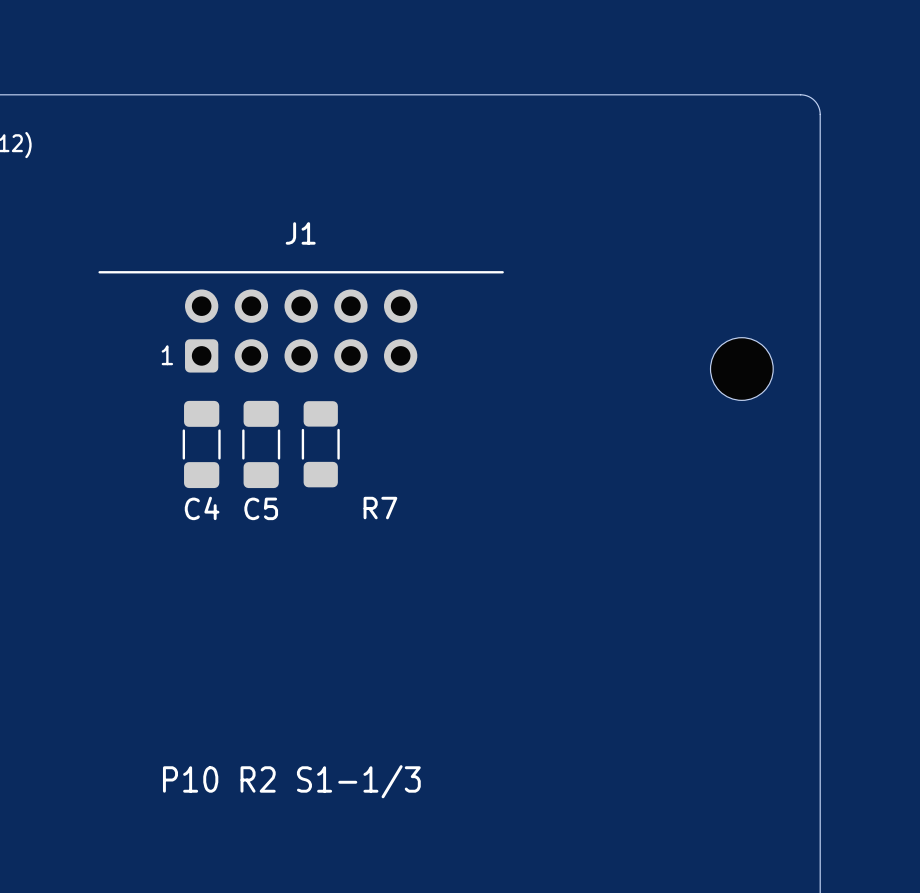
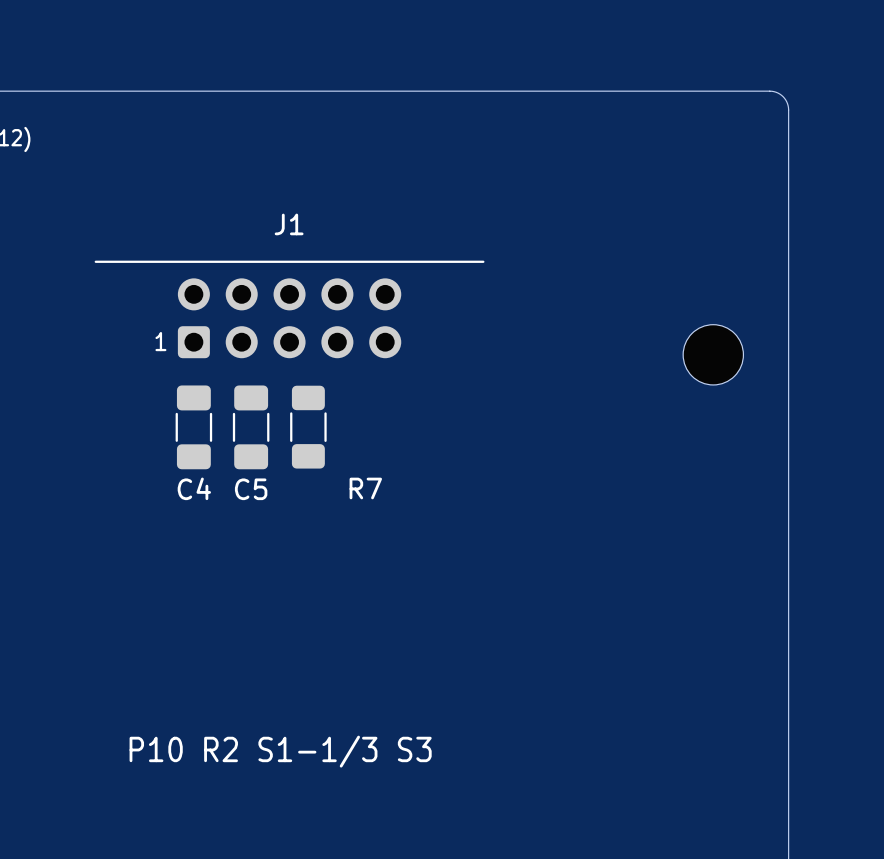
text: P10 R2 S1-1/3 (291, 781) -> P10 R2 S1-1/3 S3 (280, 751)

